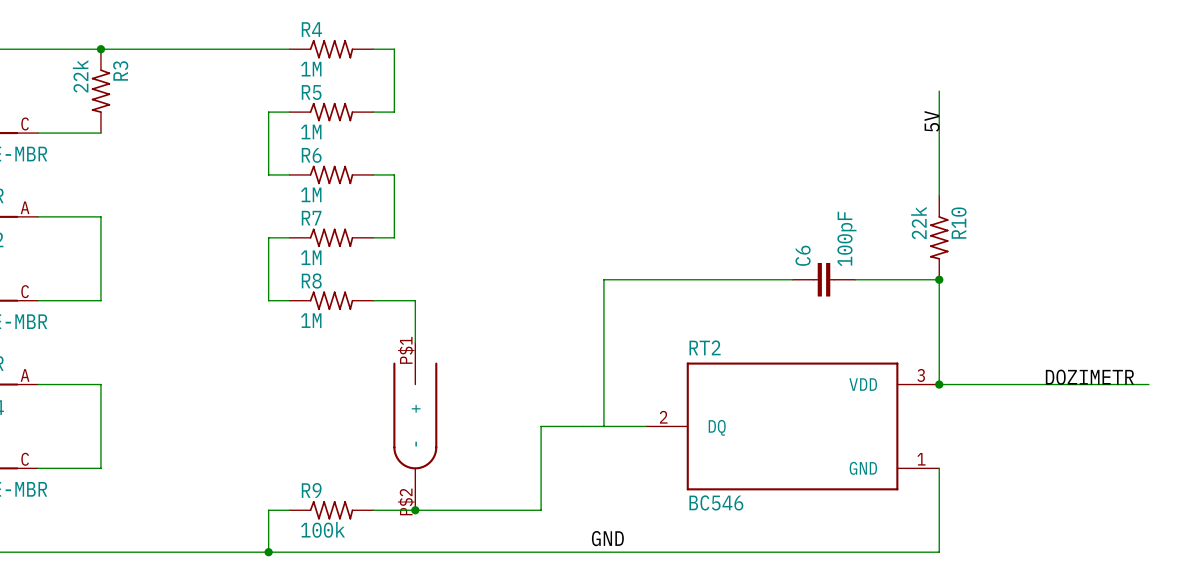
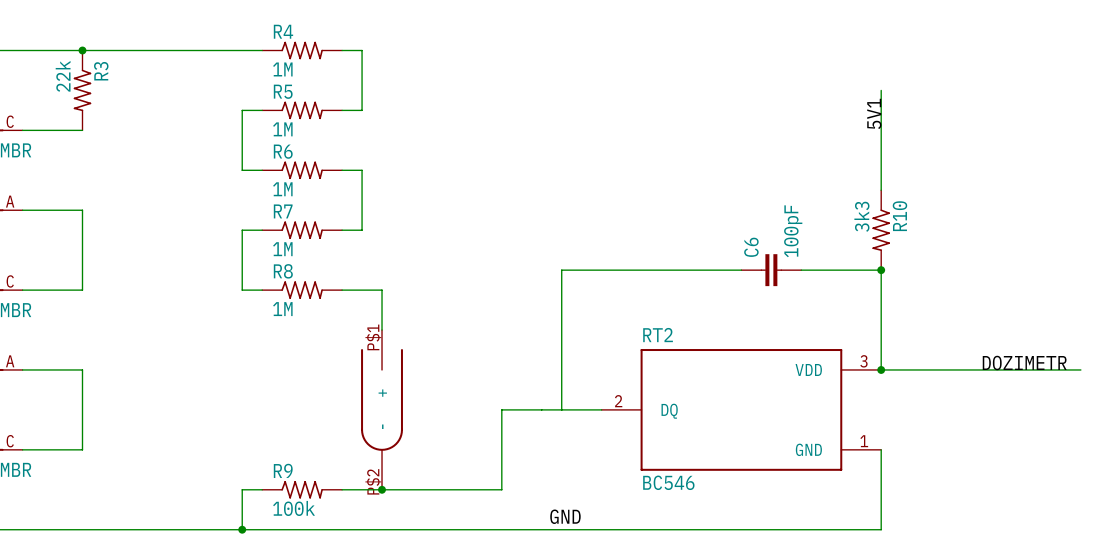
label: 5V (932, 121) -> 5V1 (874, 113)
R10 value: 22k (918, 223) -> 3k3 (861, 216)

